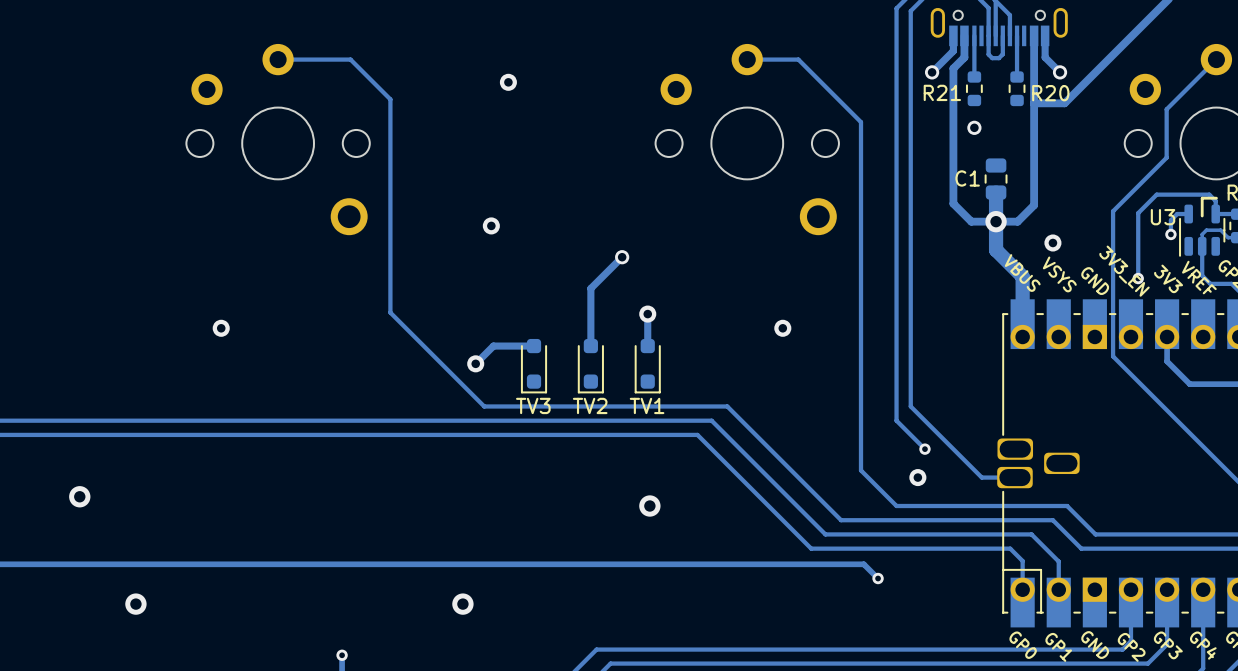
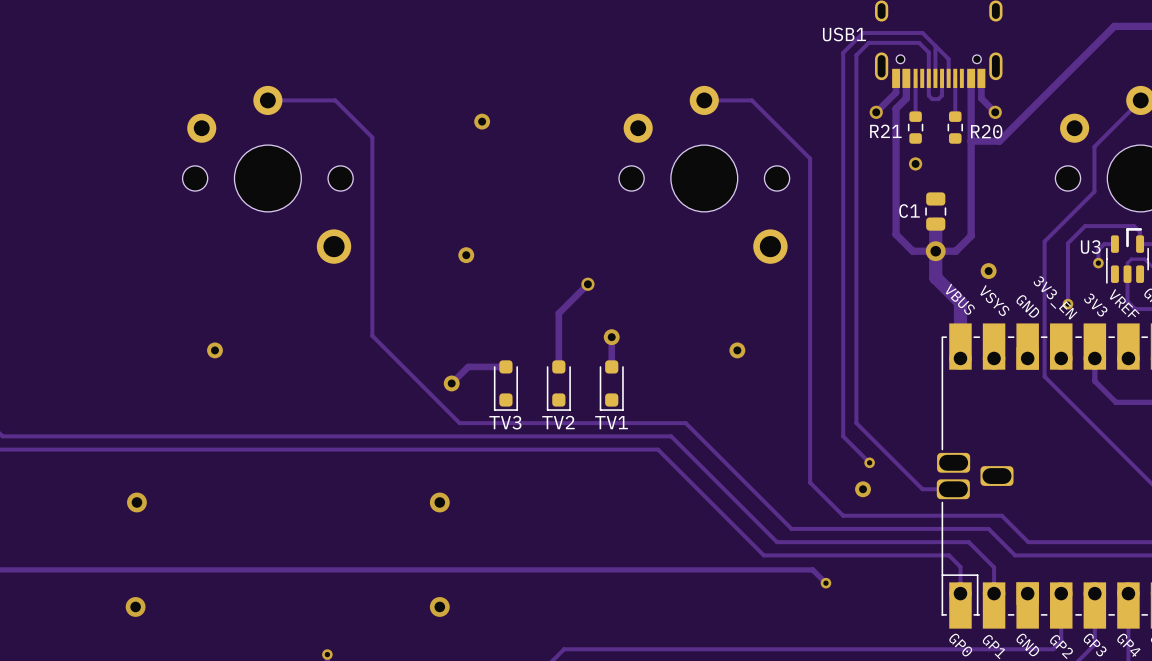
via: none -> (439, 502)
via position: (79, 496) -> (136, 502)
via: (649, 506) -> none

